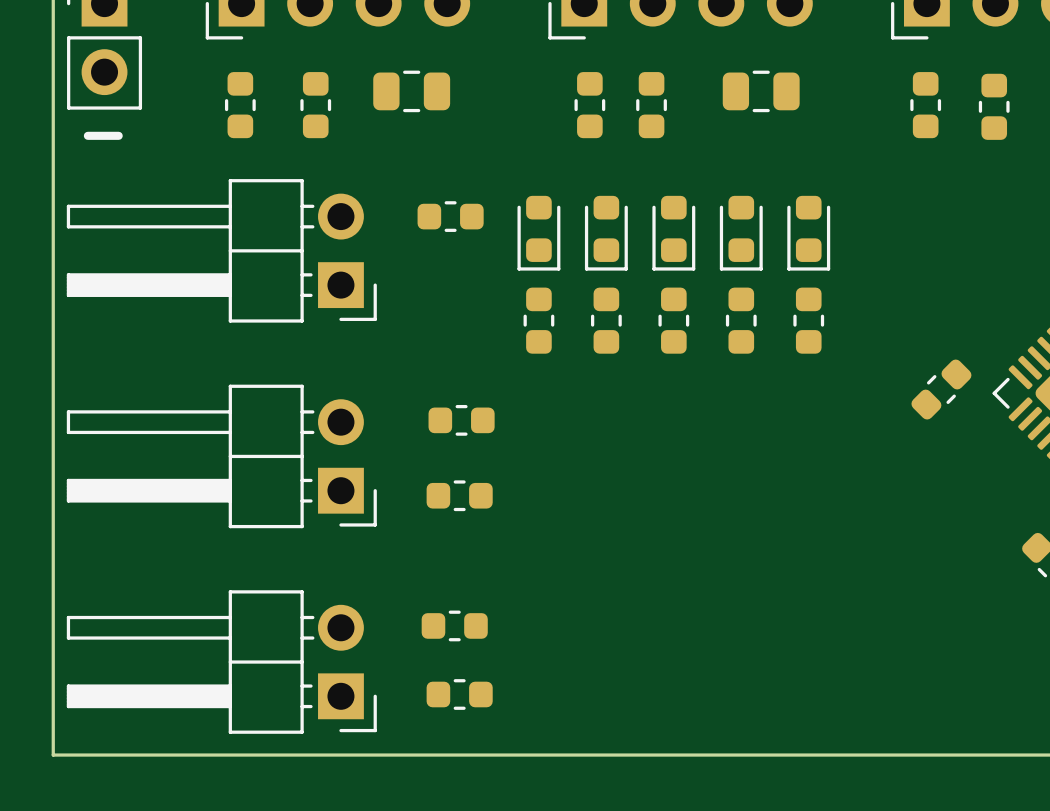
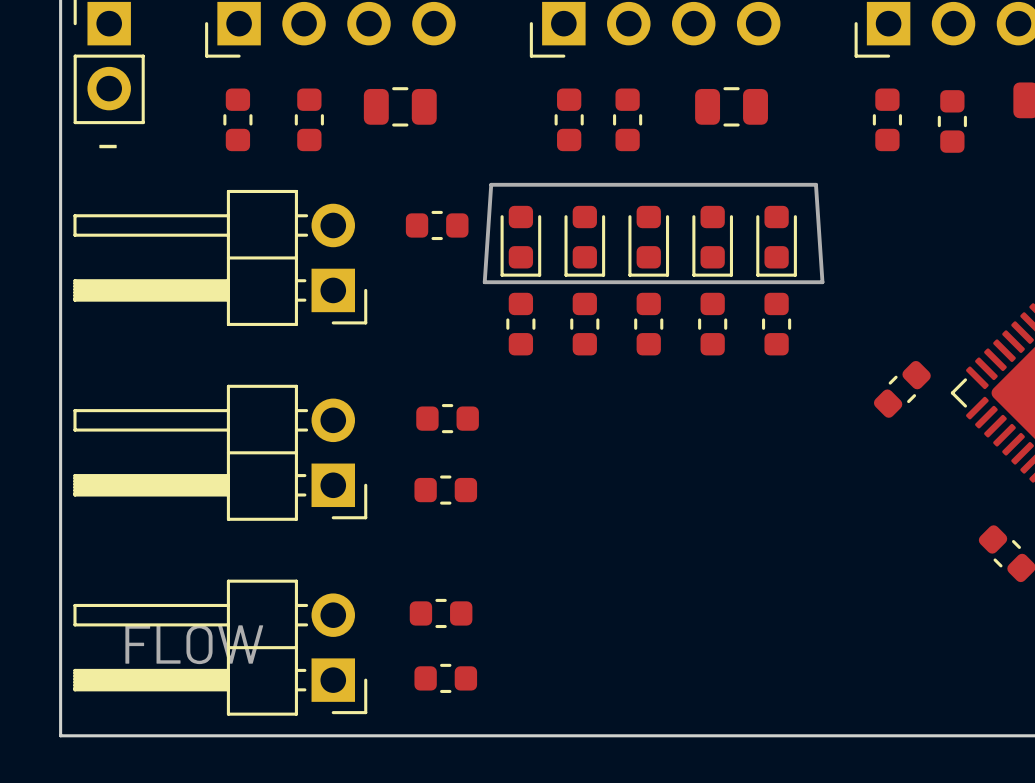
line: none -> (491, 184) (484, 282) (822, 282) (815, 184) (491, 184)
text: none -> FLOW (194, 644)

